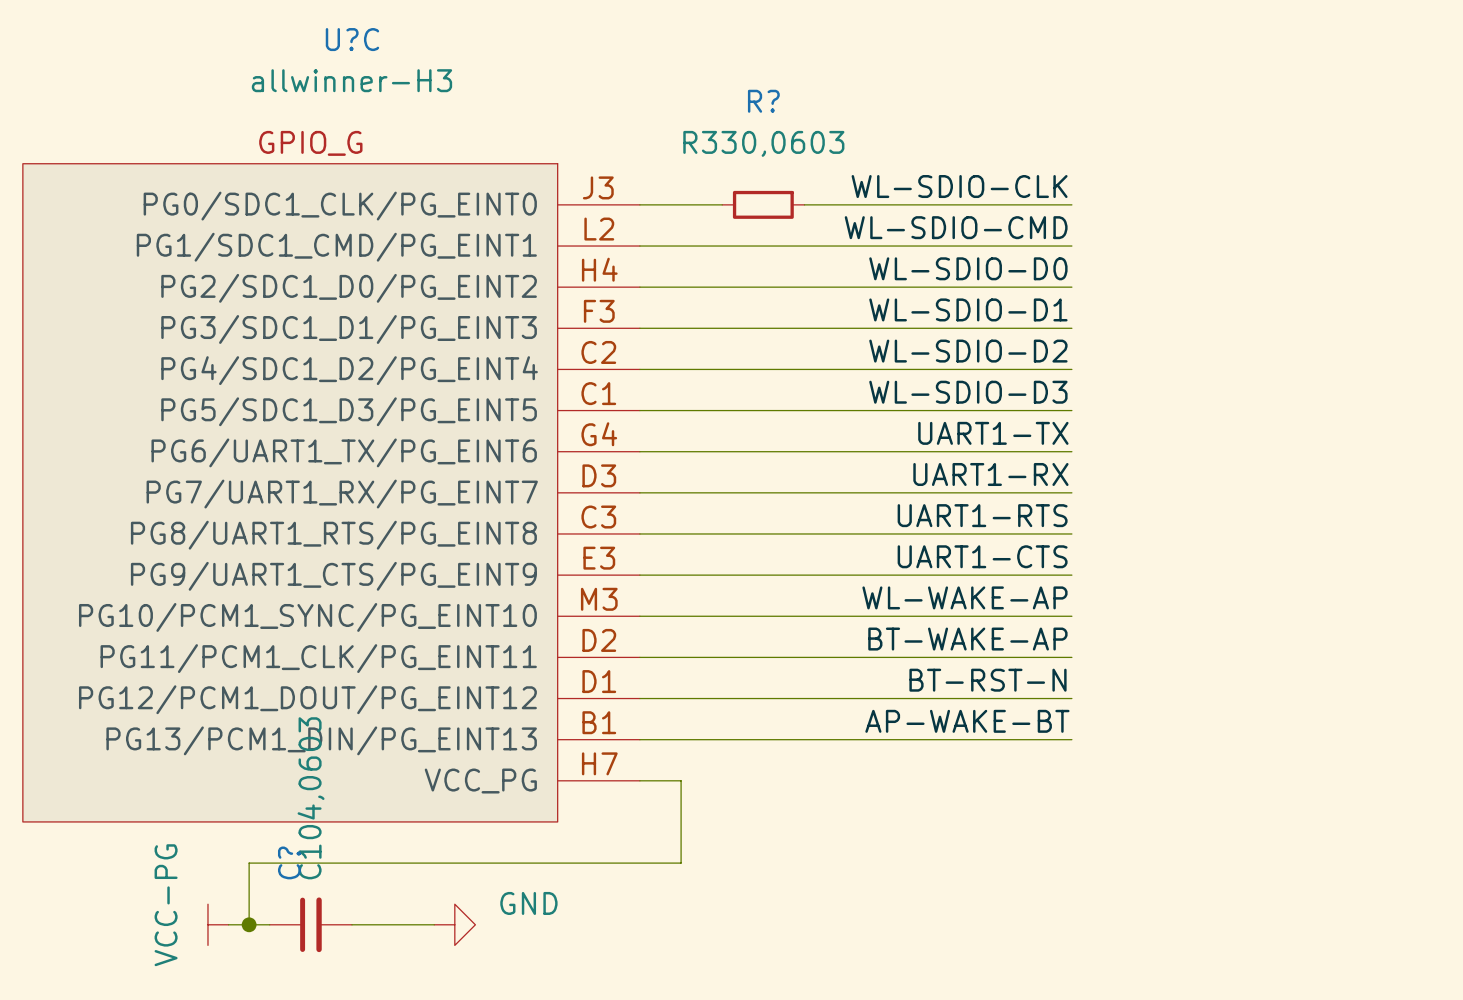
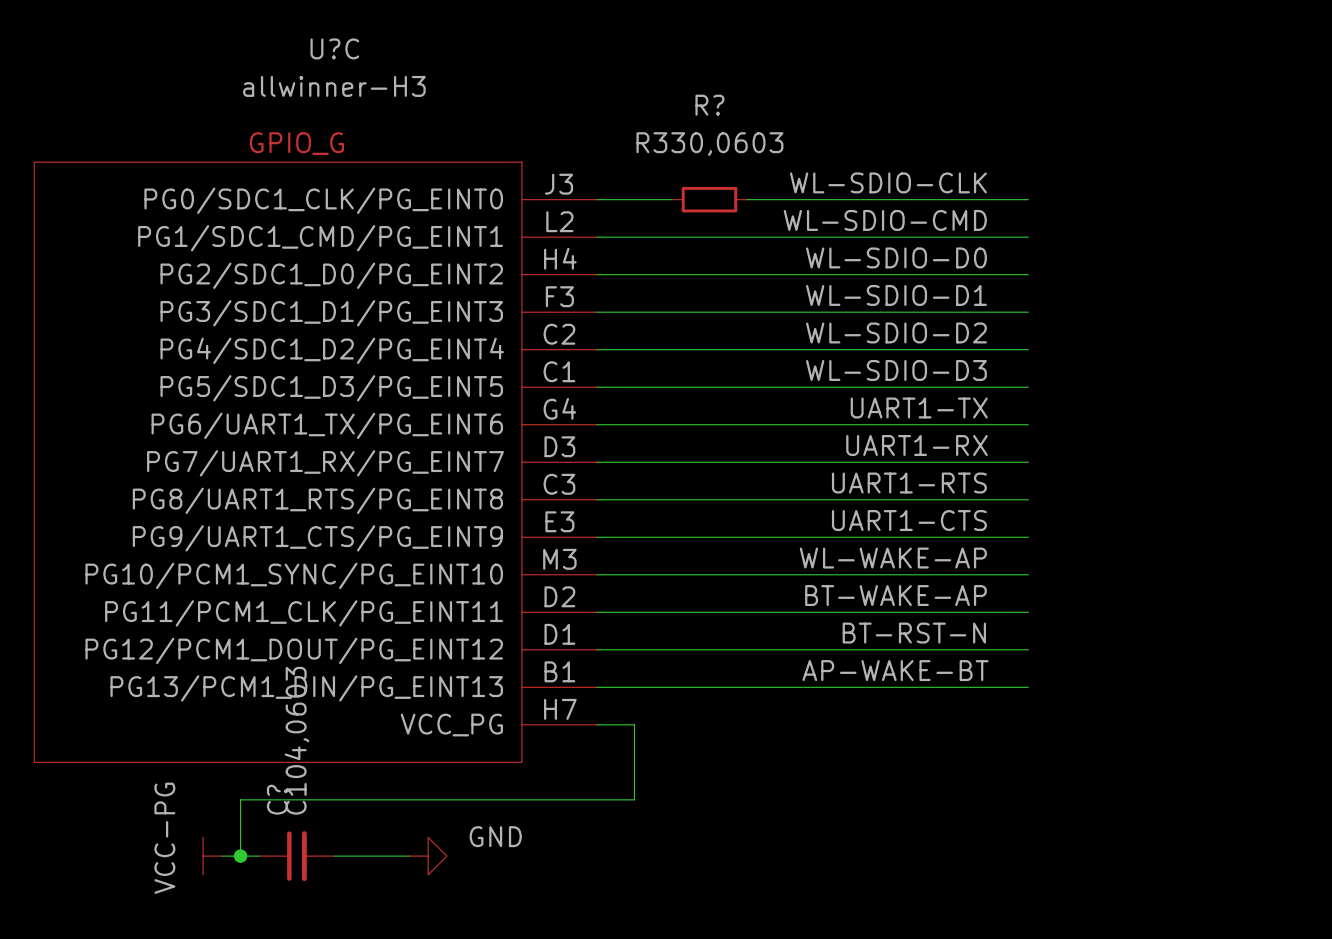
wire: none -> (990, 199) (1028, 199)
wire: none -> (990, 237) (1028, 237)
wire: none -> (990, 274) (1028, 274)
wire: none -> (990, 312) (1028, 312)
wire: none -> (990, 349) (1028, 349)
wire: none -> (990, 387) (1028, 387)
wire: none -> (990, 424) (1028, 424)
wire: none -> (990, 462) (1028, 462)
wire: none -> (990, 499) (1028, 499)
wire: none -> (990, 537) (1028, 537)
wire: none -> (990, 574) (1028, 574)
wire: none -> (990, 612) (1028, 612)
wire: none -> (990, 649) (1028, 649)
wire: none -> (990, 687) (1028, 687)

